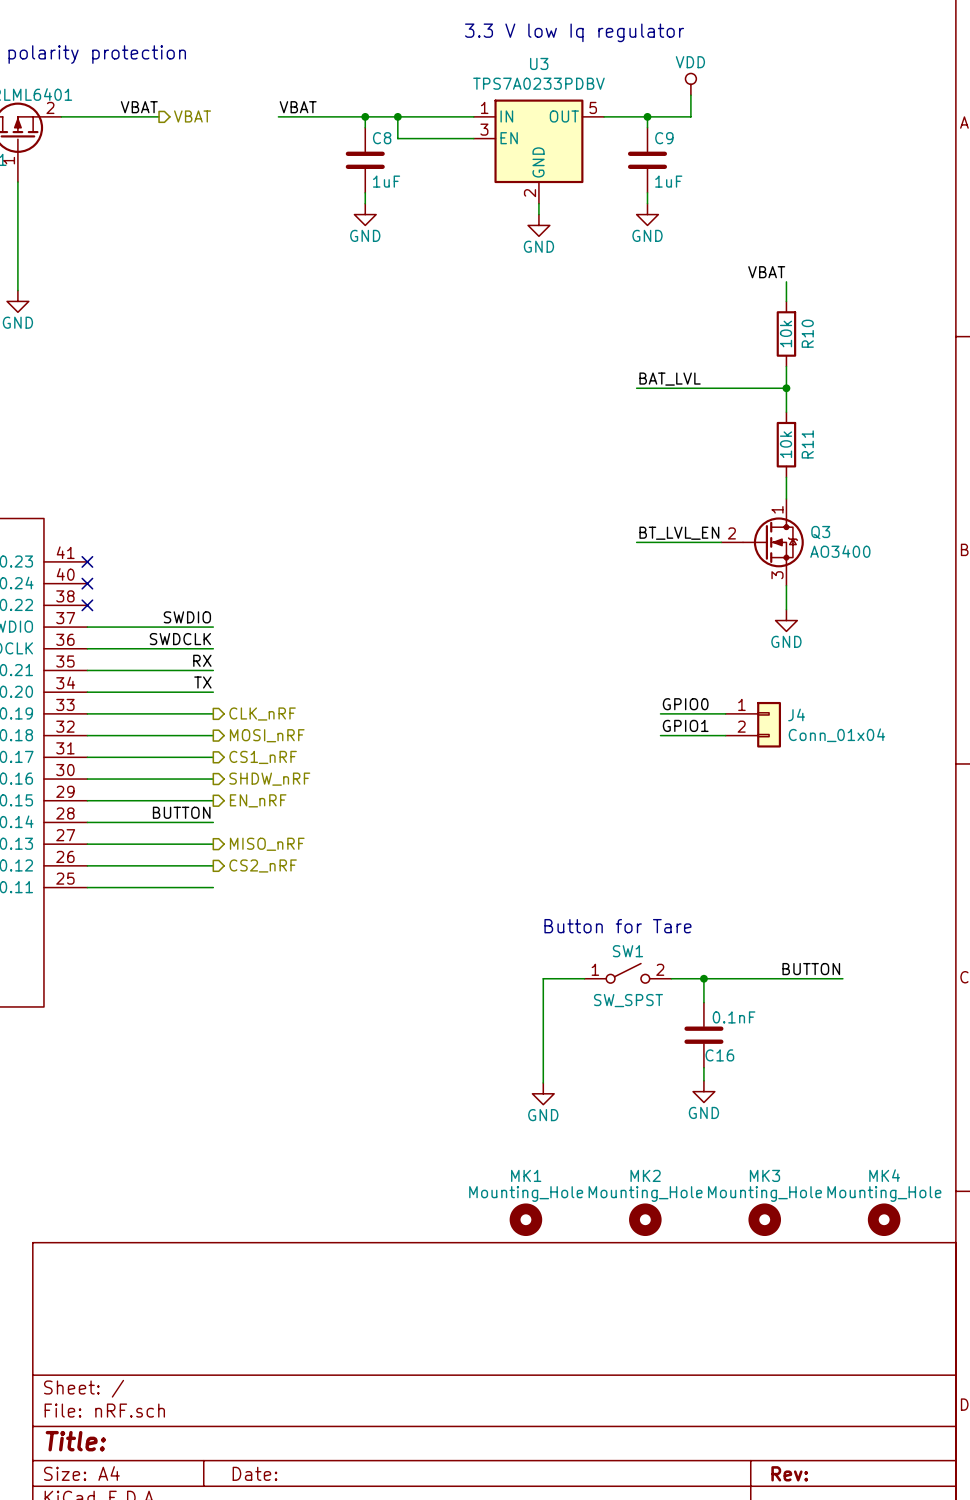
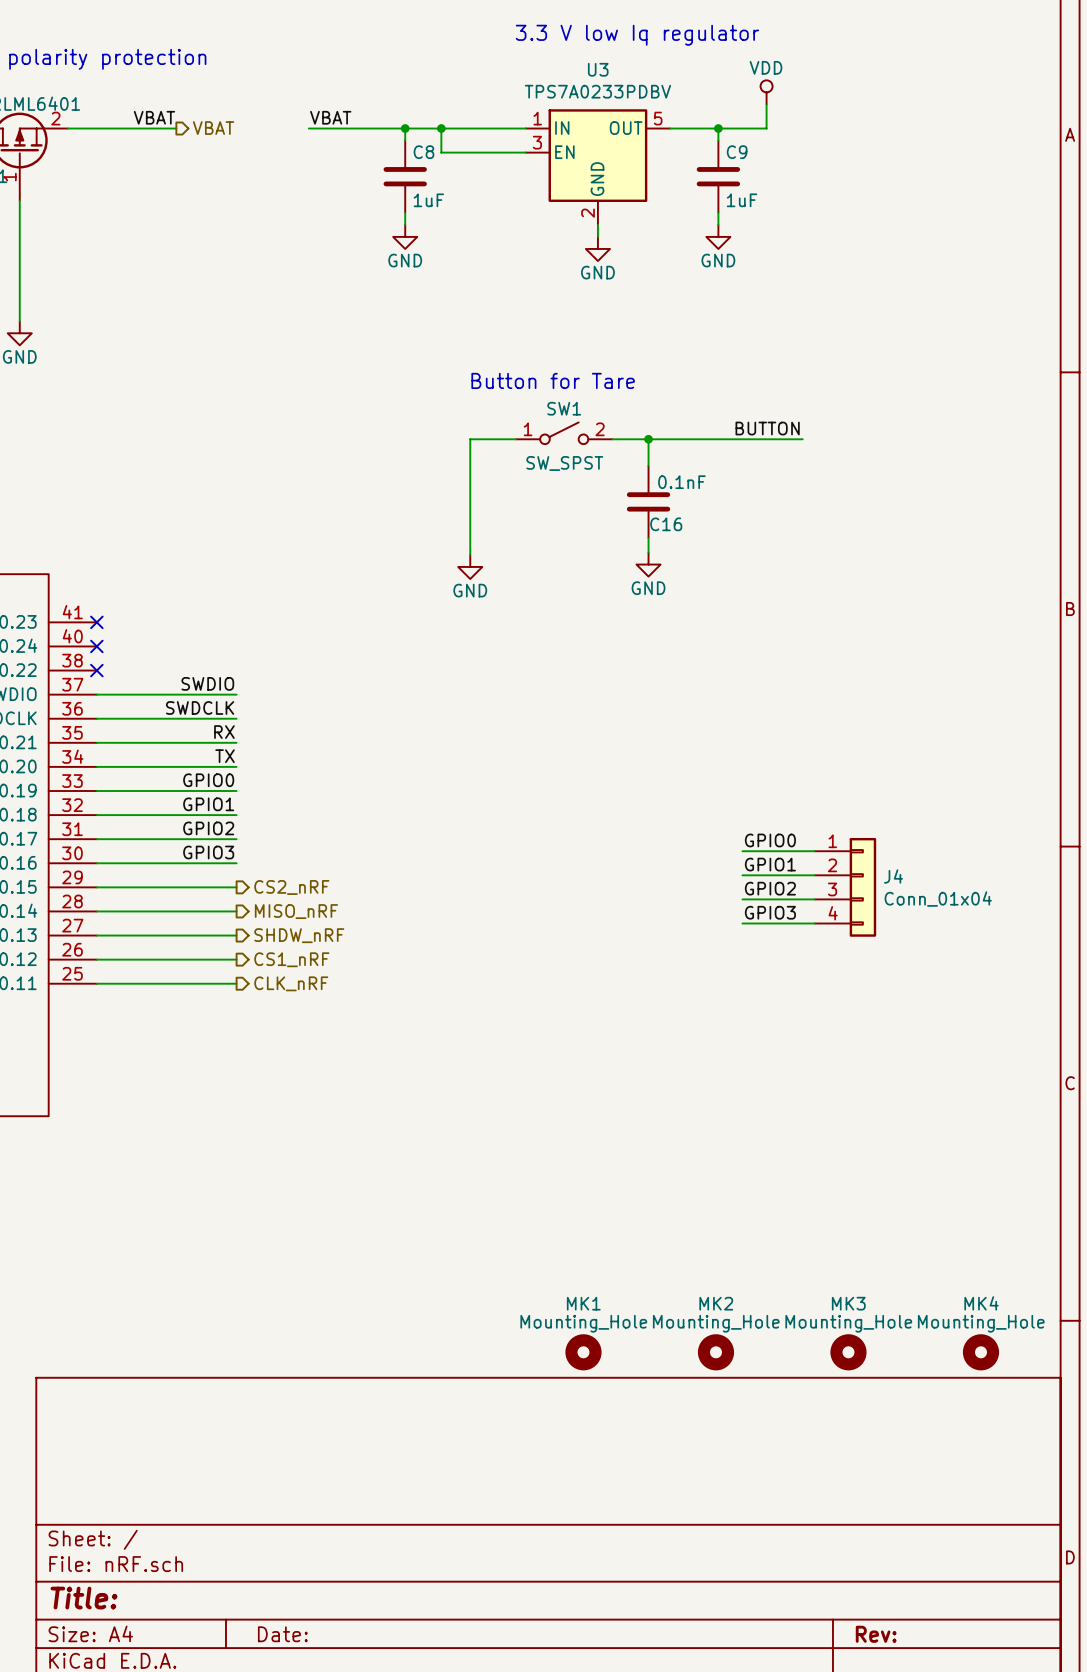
label: VBAT (766, 272) -> none
wire: (786, 281) (786, 301) -> none
R10: 10k (786, 333) -> none
text: none -> Button for Tare (553, 380)
wire: (786, 366) (786, 412) -> none
label: BAT_LVL (670, 379) -> none
label: none -> BUTTON (767, 428)
wire: (636, 388) (786, 388) -> none
junction: (786, 388) -> none
wire: none -> (516, 439) (470, 439) (470, 554)
wire: none -> (612, 439) (802, 439)
wire: none -> (648, 439) (648, 465)
junction: none -> (648, 439)
R11: 10k (786, 444) -> none
wire: (786, 477) (786, 498) -> none
wire: none -> (648, 538) (648, 552)
power symbol: none -> GND (648, 564)
power symbol: none -> GND (470, 566)
label: BT_LVL_EN (679, 533) -> none
wire: (636, 542) (721, 542) -> none
Q3: AO3400 (762, 542) -> none
wire: (786, 585) (786, 609) -> none
power symbol: GND (786, 620) -> none
J4 symbol: [725, 701, 782, 748] -> [814, 837, 877, 937]
label: none -> GPIO0 (208, 780)
label position: GPIO0 (685, 704) -> GPIO0 (770, 840)
wire: (660, 713) (725, 713) -> (742, 851) (814, 851)
hierarchical label position: CLK_nRF (262, 714) -> CLK_nRF (291, 983)
label: none -> GPIO1 (208, 804)
label position: GPIO1 (685, 725) -> GPIO1 (770, 864)
hierarchical label: MOSI_nRF (267, 735) -> none
wire: (660, 735) (725, 735) -> (742, 875) (814, 875)
label: none -> GPIO2 (208, 828)
hierarchical label: CS1_nRF (263, 757) -> none
label: none -> GPIO3 (208, 852)
hierarchical label: SHDW_nRF (269, 779) -> none
hierarchical label: EN_nRF (258, 800) -> CS2_nRF (291, 887)
label: none -> GPIO2 (770, 888)
wire: none -> (742, 899) (814, 899)
label: BUTTON (181, 812) -> none
hierarchical label: none -> MISO_nRF (296, 911)
label: none -> GPIO3 (770, 912)
wire: none -> (742, 923) (814, 923)
hierarchical label: MISO_nRF (267, 844) -> SHDW_nRF (299, 935)
hierarchical label: CS2_nRF (263, 865) -> CS1_nRF (291, 959)
text: Button for Tare (617, 926) -> none
label: BUTTON (811, 969) -> none
SW1 position: (627, 973) -> (564, 433)
wire: (584, 978) (543, 978) (543, 1082) -> none
wire: (671, 978) (842, 978) -> none
wire: (703, 978) (703, 1002) -> none
junction: (703, 978) -> none
C16 position: (703, 1035) -> (648, 501)
wire: (703, 1067) (703, 1080) -> none
power symbol: GND (703, 1091) -> none
power symbol: GND (543, 1093) -> none

